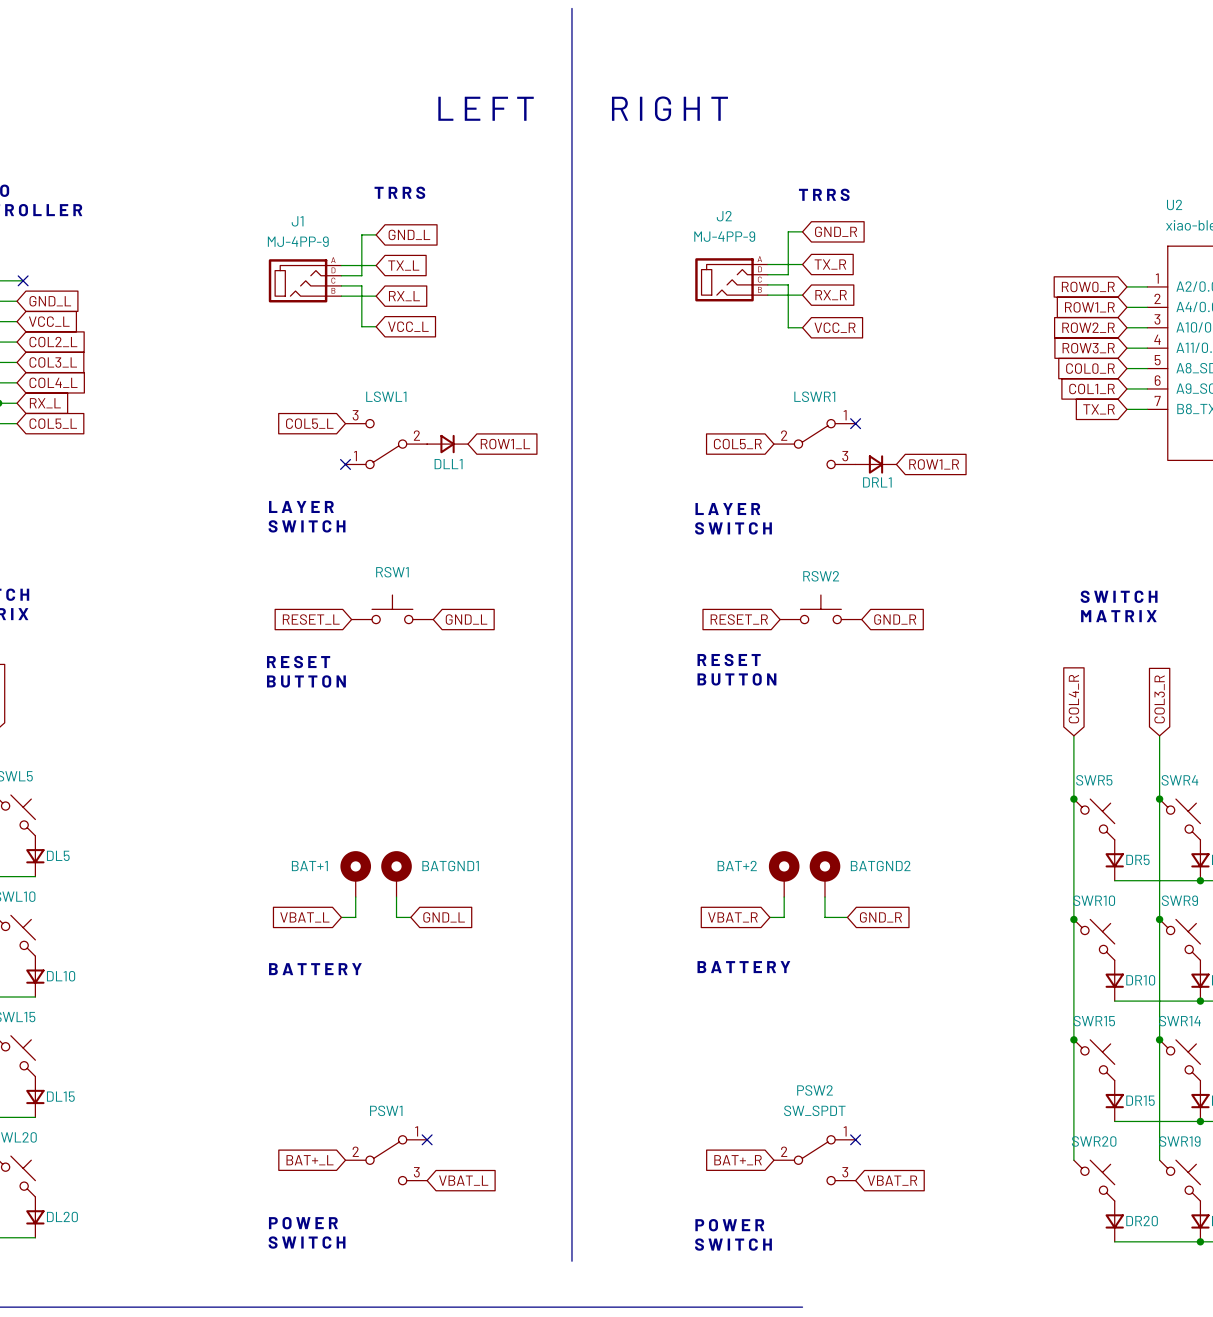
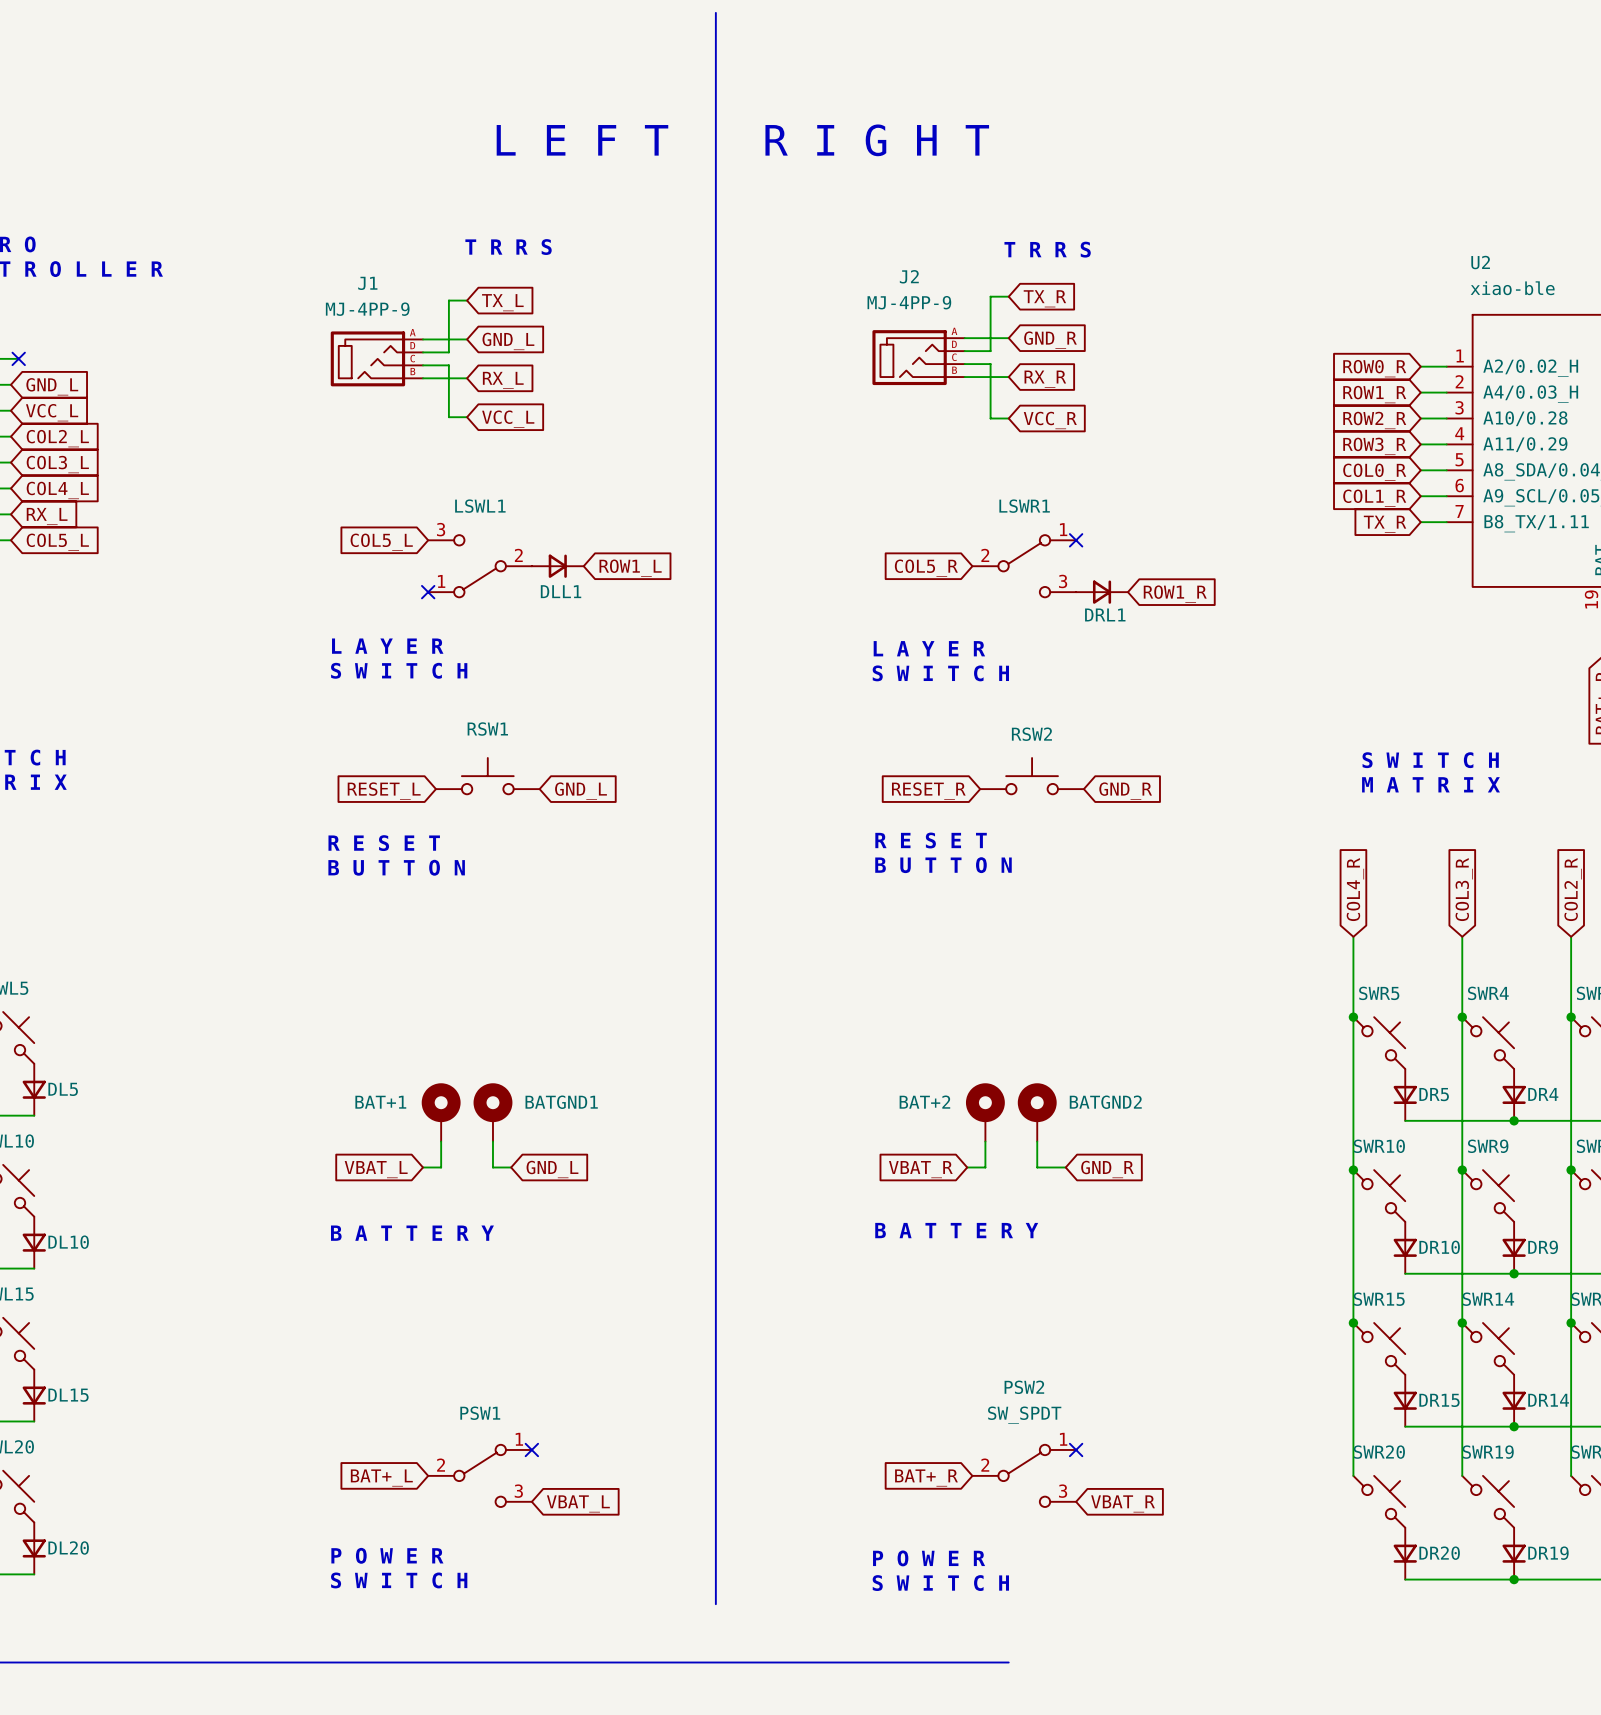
global label: GND_R (836, 231) -> TX_R (1044, 298)
global label: GND_L (409, 234) -> TX_L (502, 302)
global label: TX_R (830, 264) -> GND_R (1050, 340)
global label: TX_L (403, 265) -> GND_L (508, 341)

